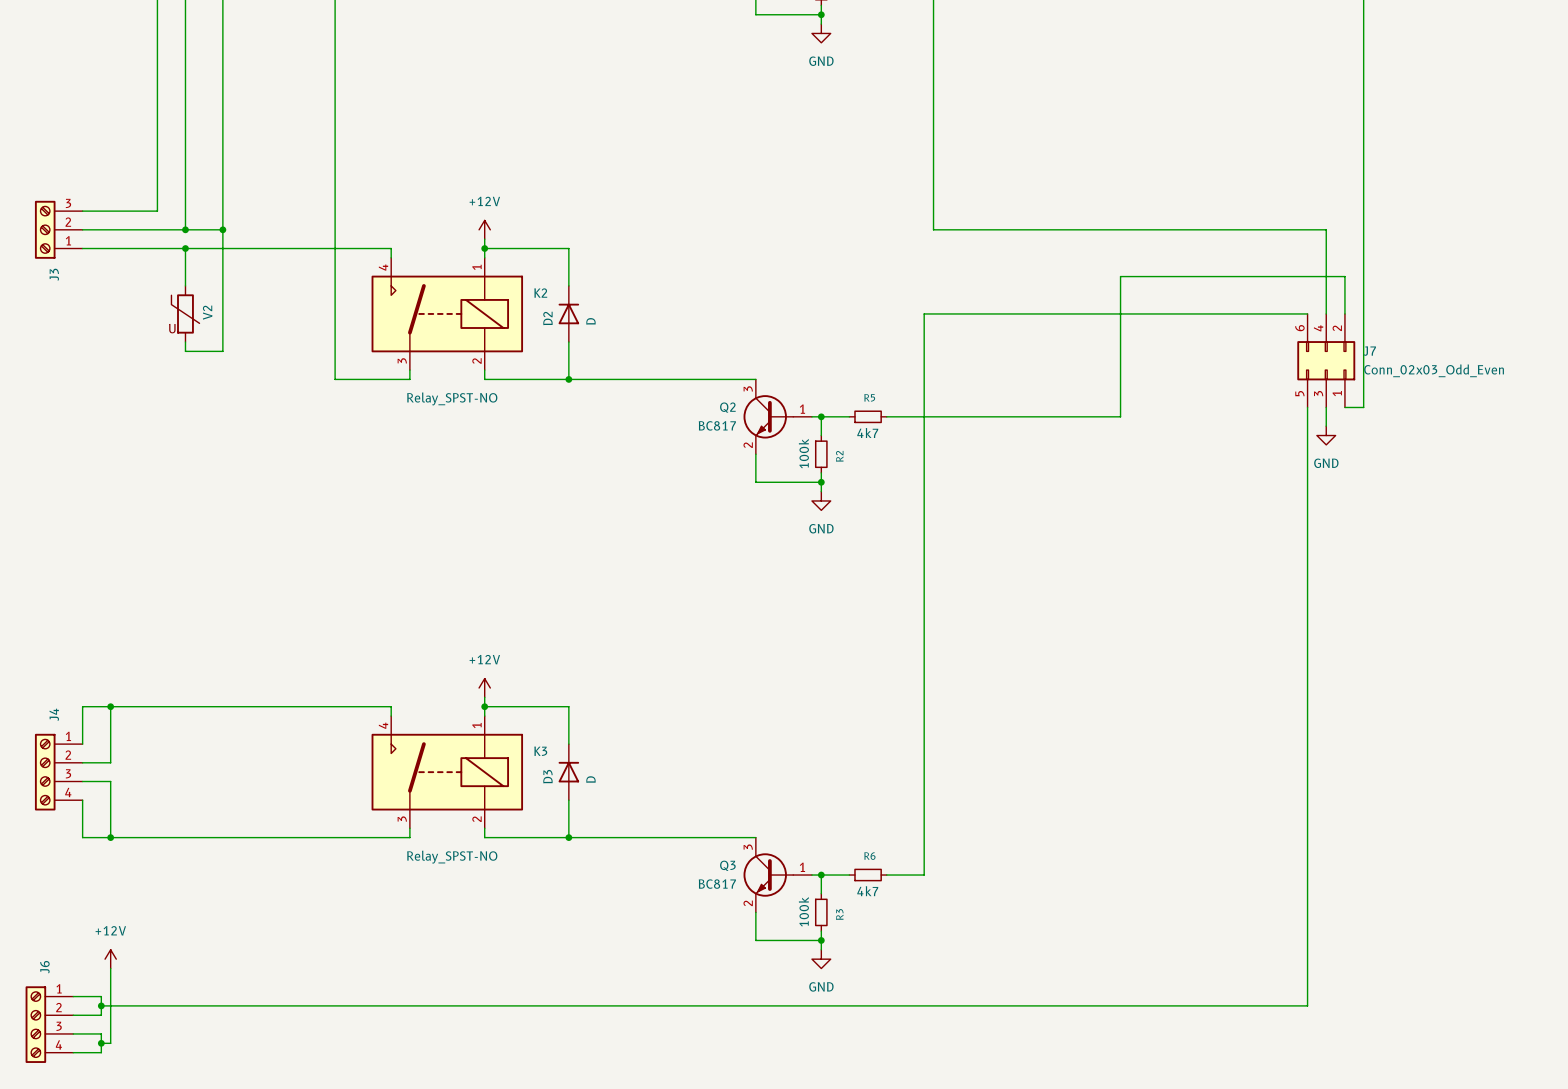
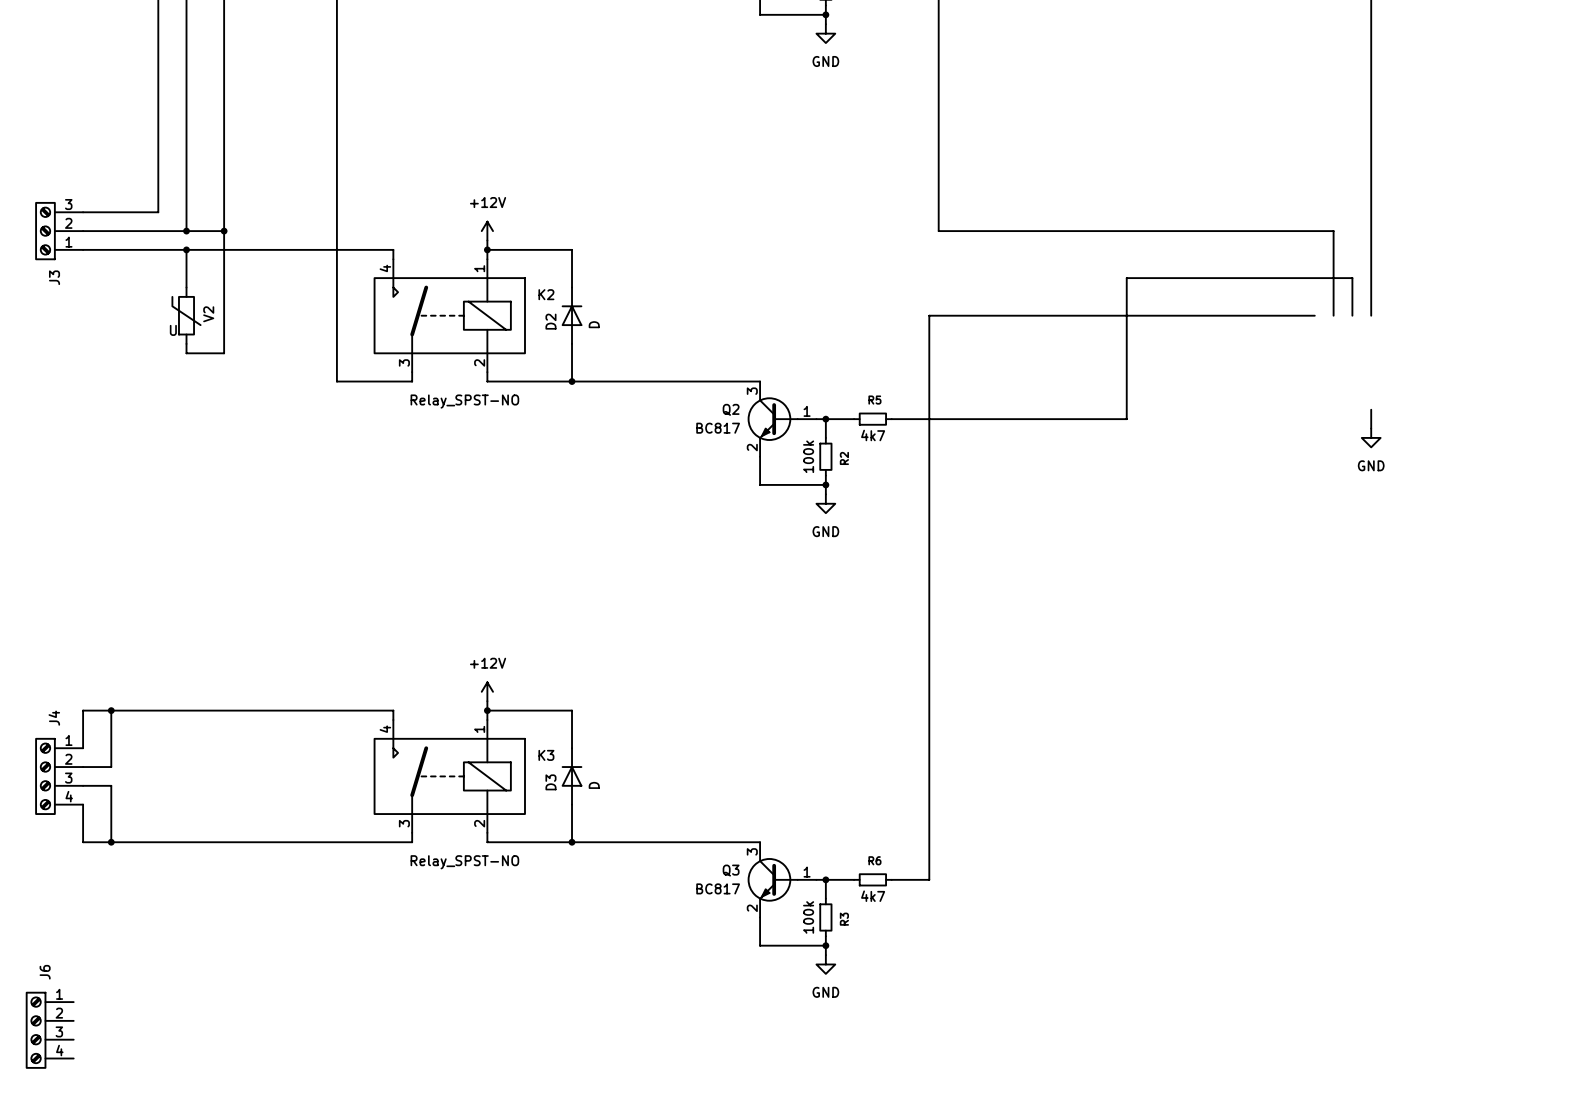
wire: (1363, 313) (1363, 407) (1344, 407) -> none
J7: Conn_02x03_Odd_Even (1326, 360) -> none
wire: (1307, 407) (1307, 1005) (101, 1005) -> none
wire: (1326, 407) (1326, 426) -> (1371, 409) (1371, 428)
power symbol position: GND (1326, 435) -> GND (1371, 437)
power symbol: +12V (110, 959) -> none
wire: (110, 968) (110, 1043) (101, 1043) -> none
wire: (73, 996) (101, 996) (101, 1015) (73, 1015) -> none
junction: (101, 1005) -> none
wire: (73, 1033) (101, 1033) (101, 1052) (73, 1052) -> none
junction: (101, 1043) -> none

